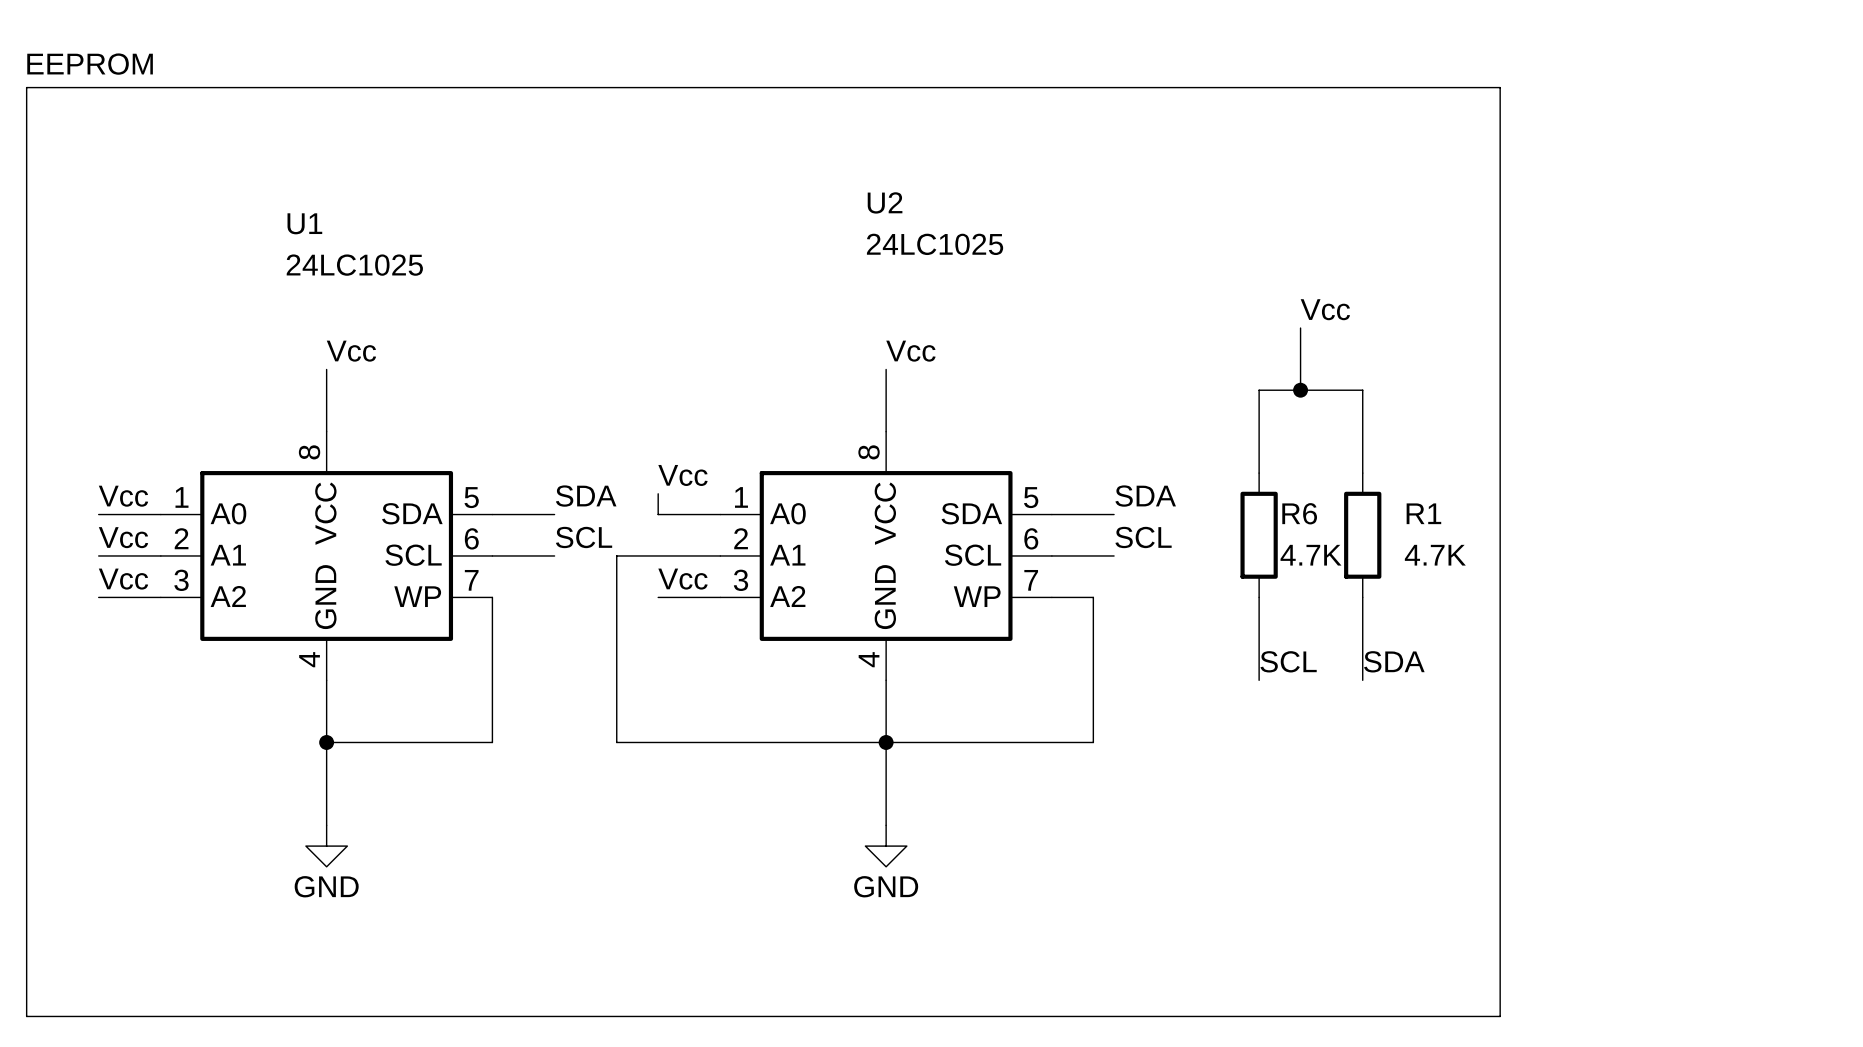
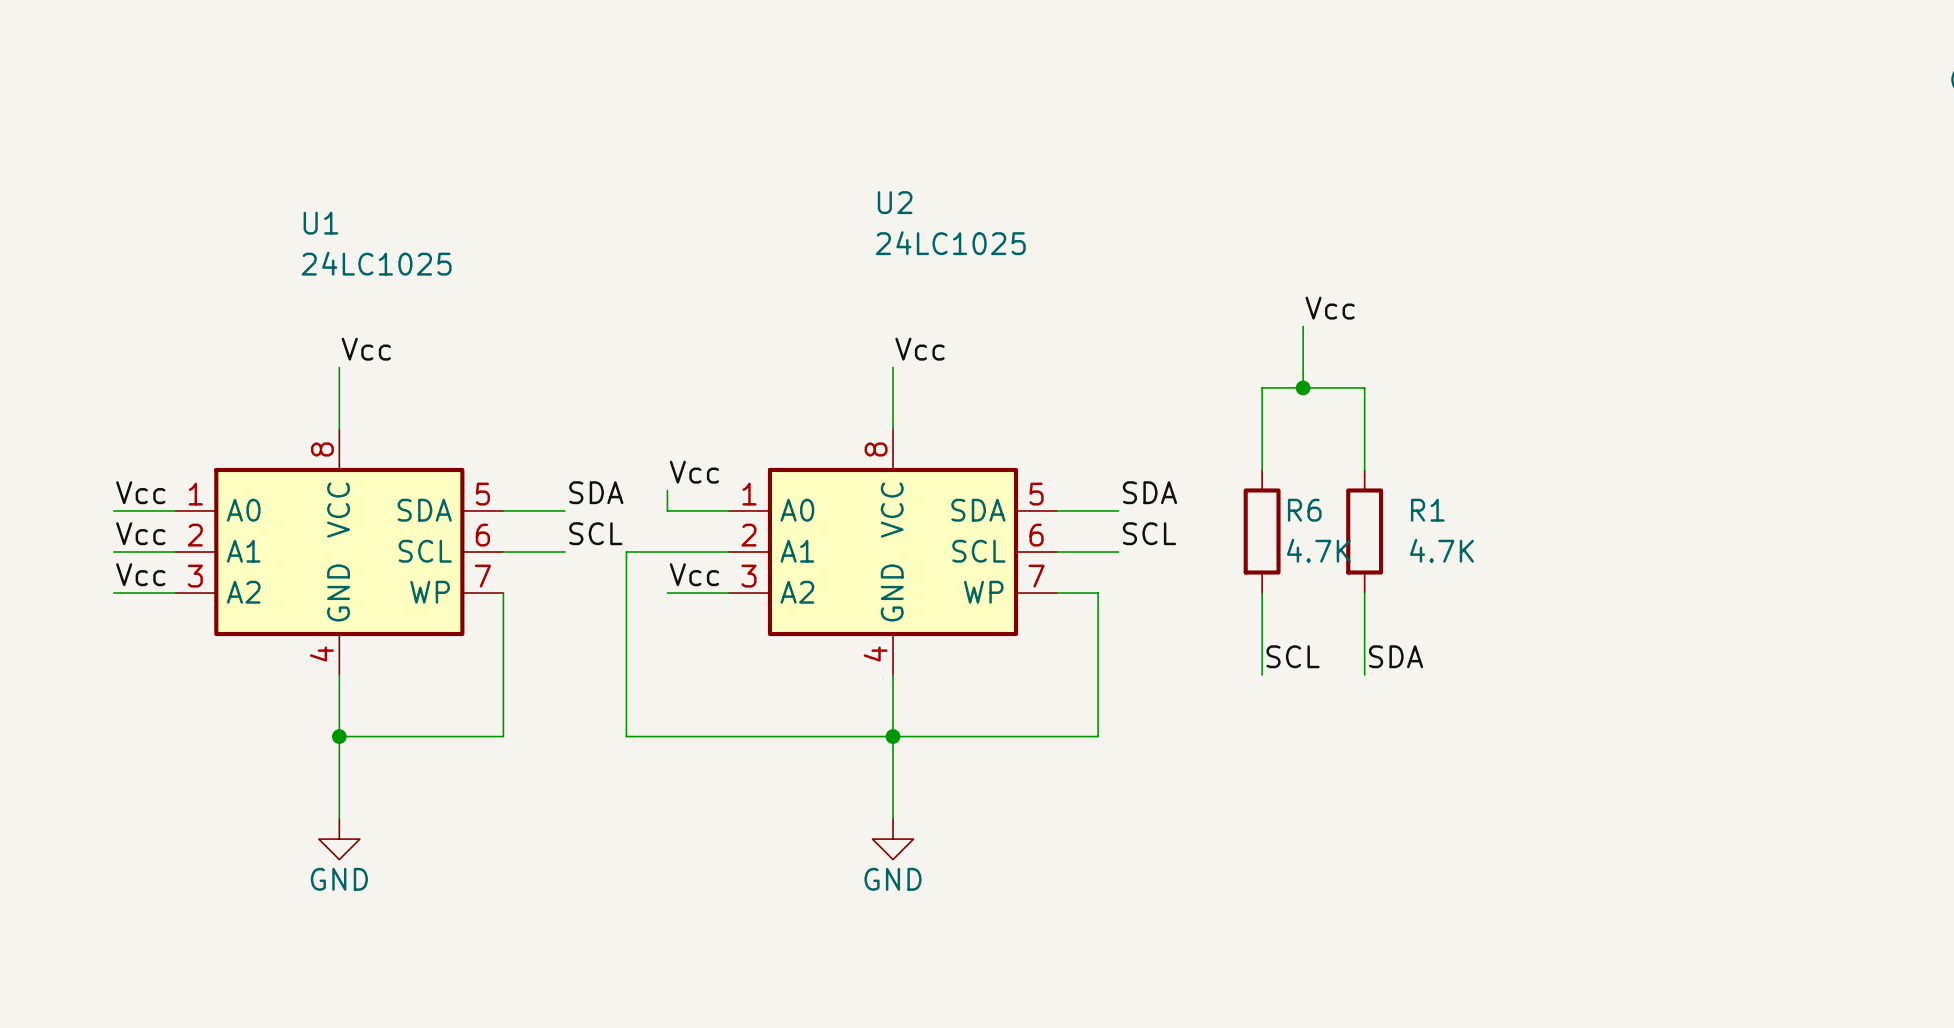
text: EEPROM (90, 64) -> none
line: (26, 87) (1500, 87) (1500, 1016) (26, 1016) (26, 87) -> none

